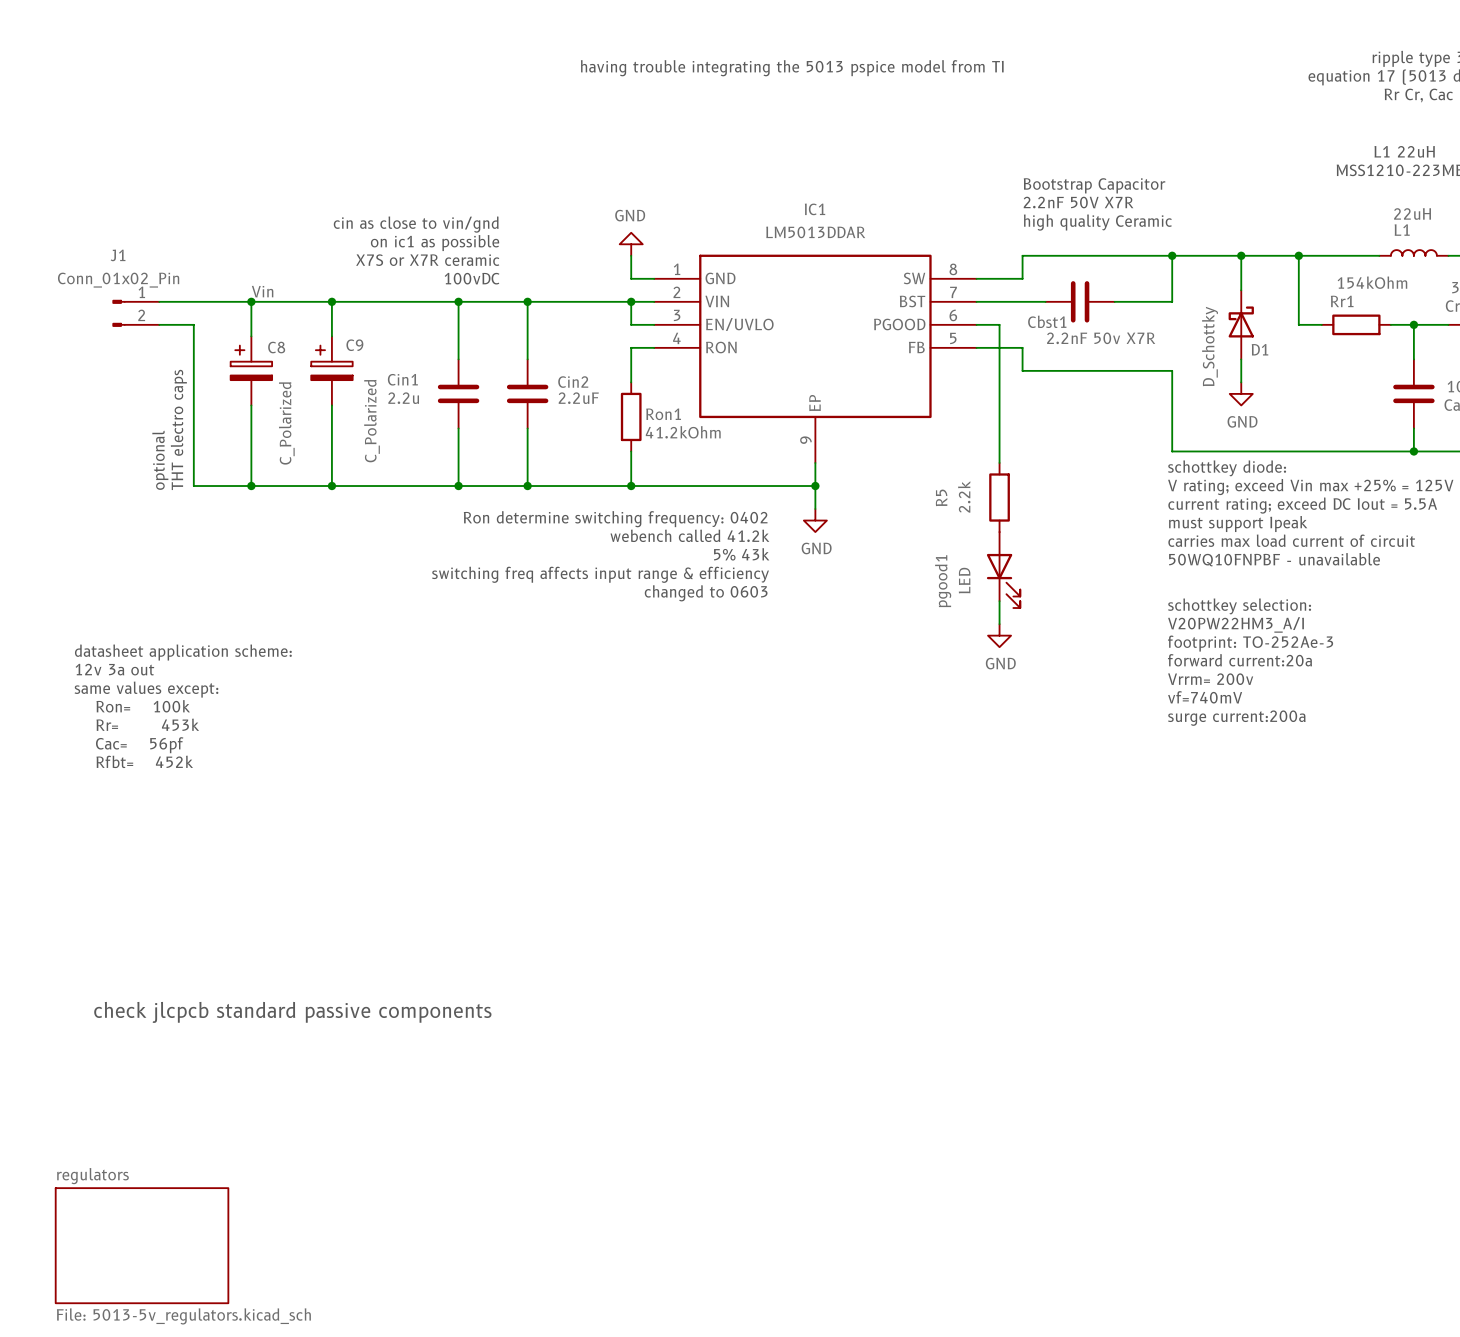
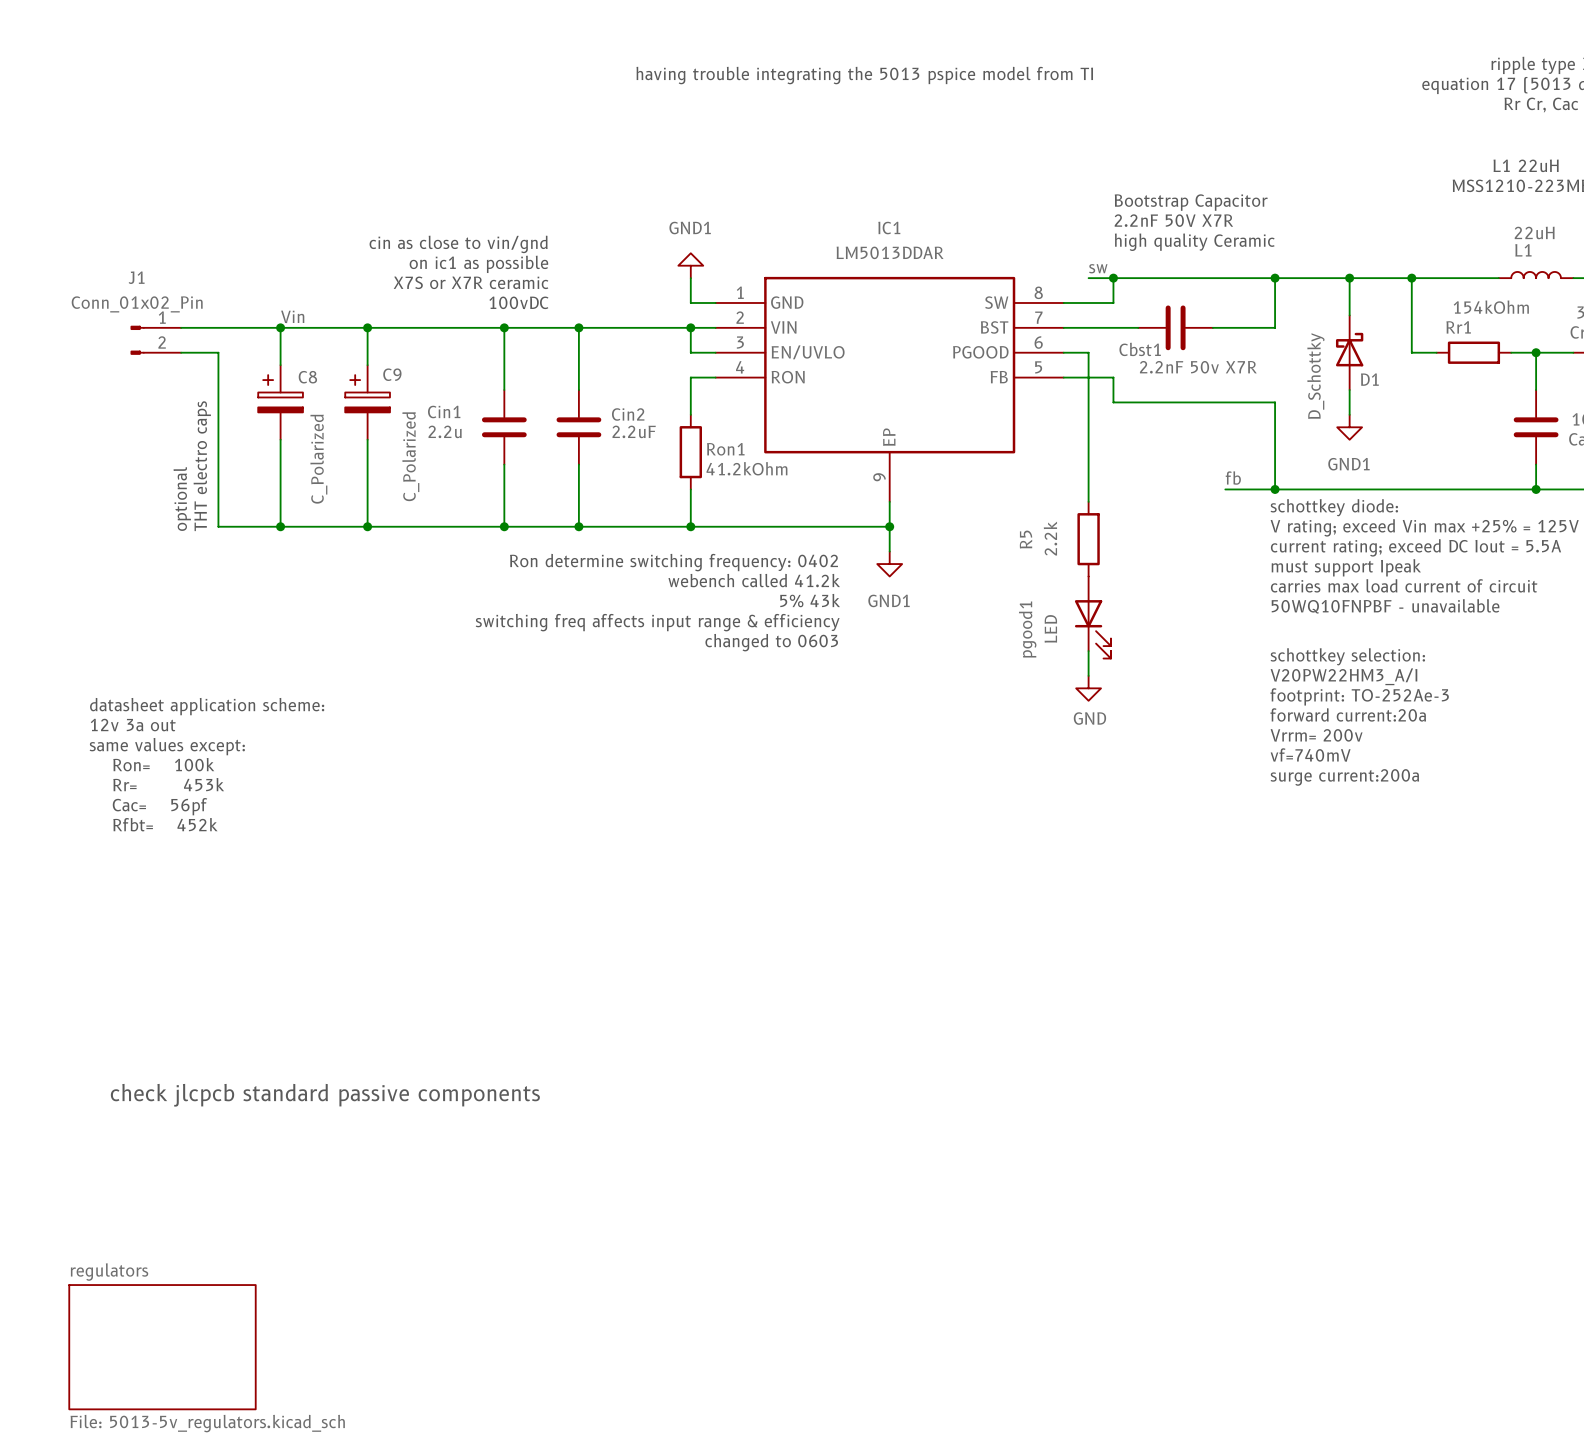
power symbol: GND (631, 244) -> GND1 (690, 265)
label: none -> sw (1098, 268)
wire: none -> (1088, 278) (1113, 278)
junction: none -> (1113, 278)
power symbol: GND (1241, 393) -> GND1 (1349, 427)
label: none -> fb (1233, 478)
wire: none -> (1225, 489) (1275, 489)
junction: none -> (1275, 489)
power symbol: GND (815, 520) -> GND1 (889, 564)

